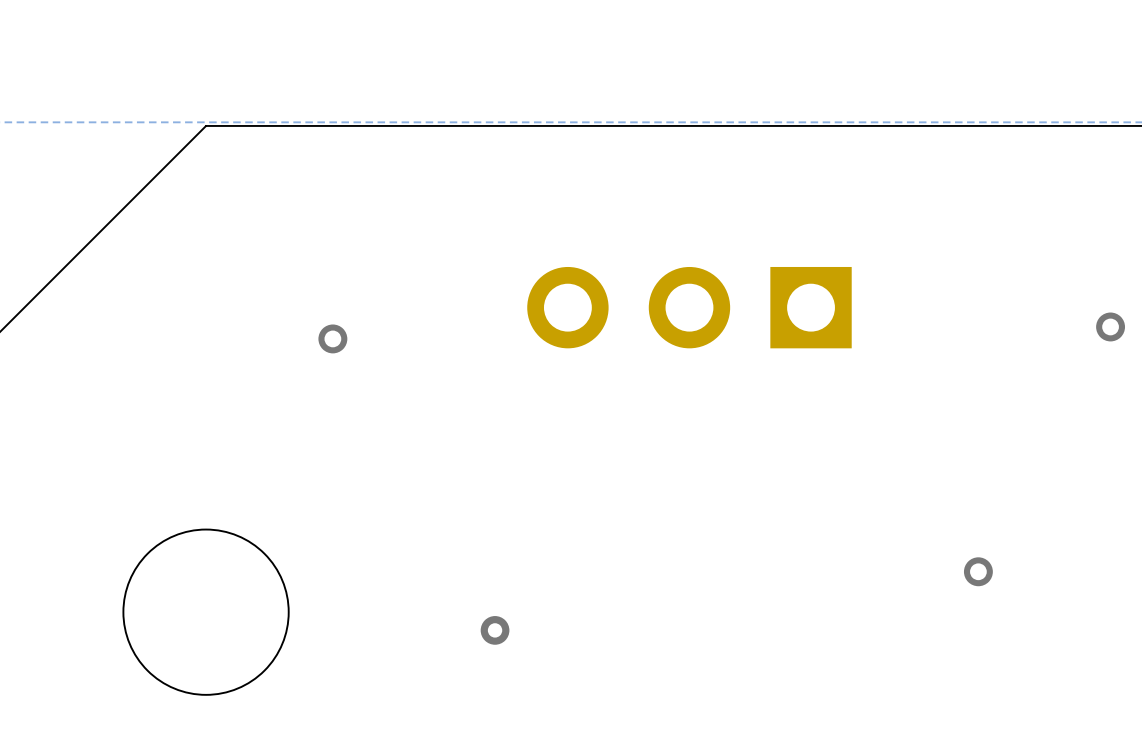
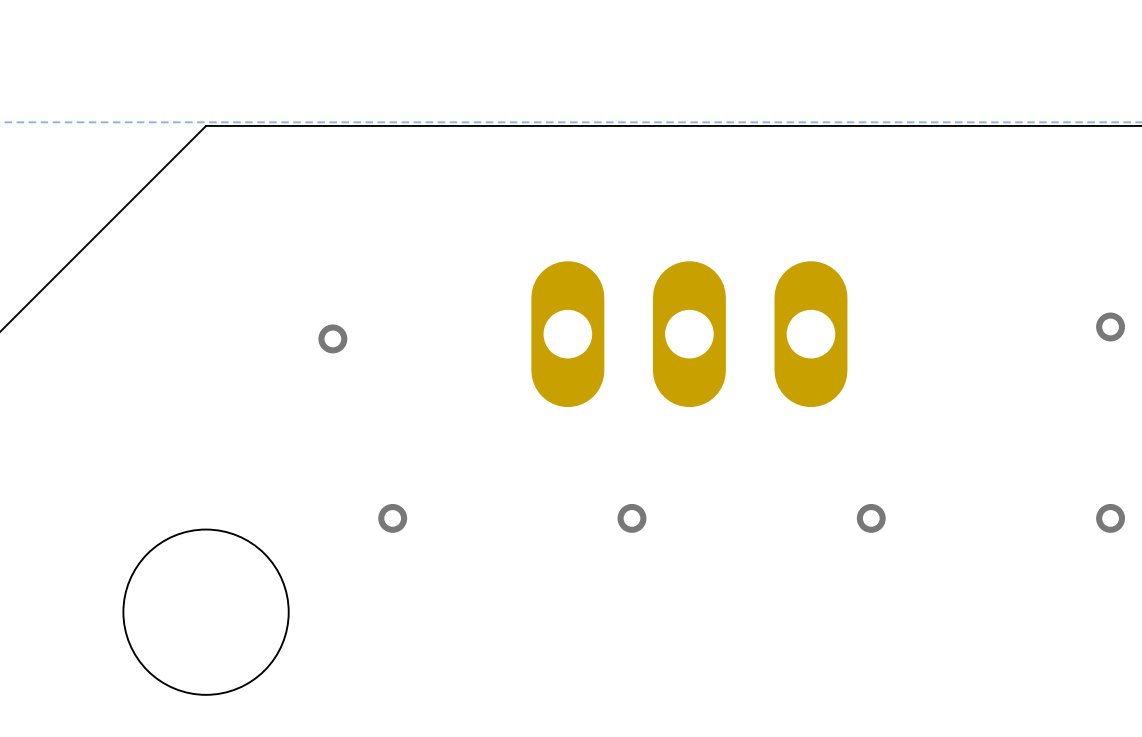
part footprint: [527, 266, 852, 349] -> [531, 261, 848, 408]
via: none -> (392, 518)
via: none -> (631, 518)
via: none -> (871, 518)
via: none -> (1110, 518)
via: (978, 571) -> none
via: (495, 630) -> none

